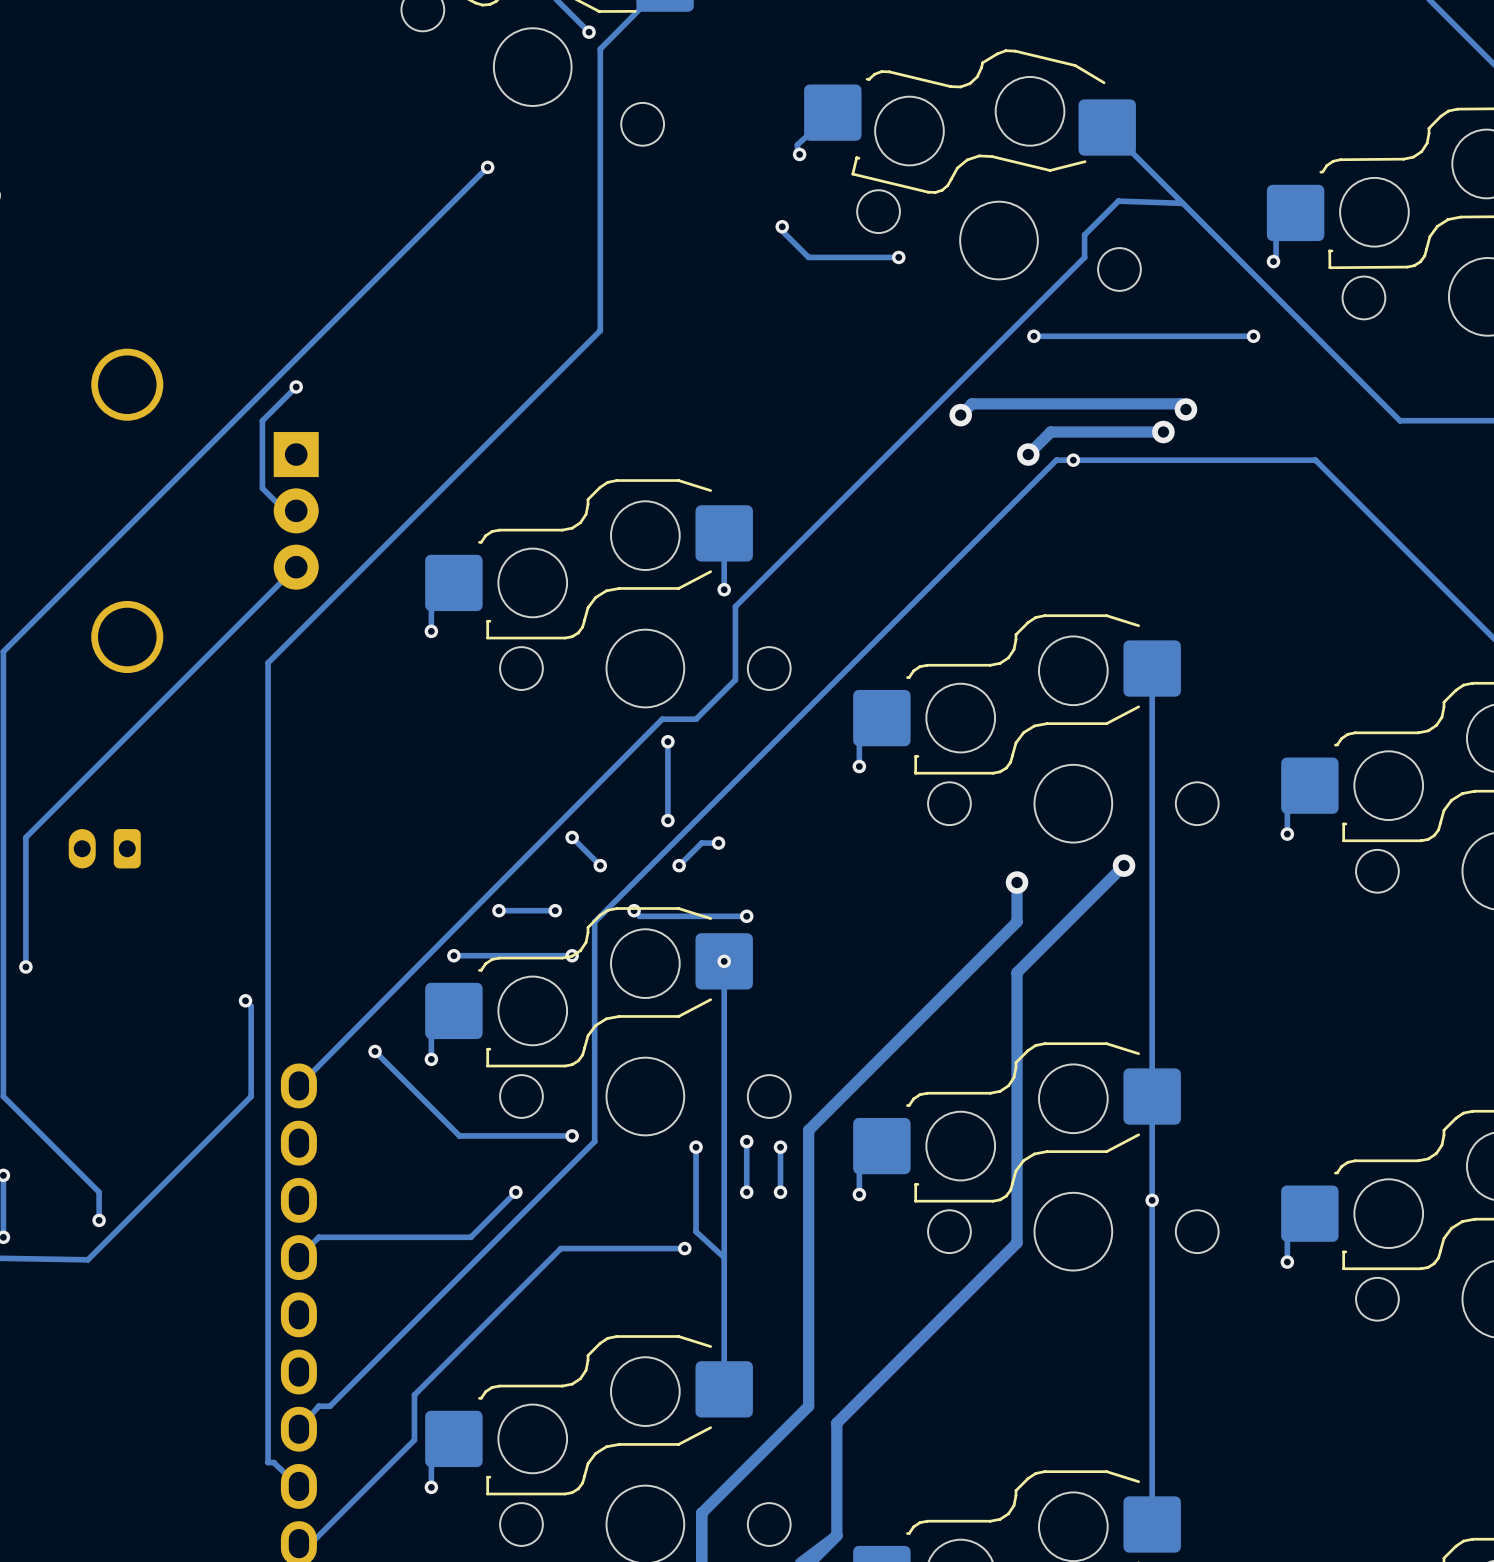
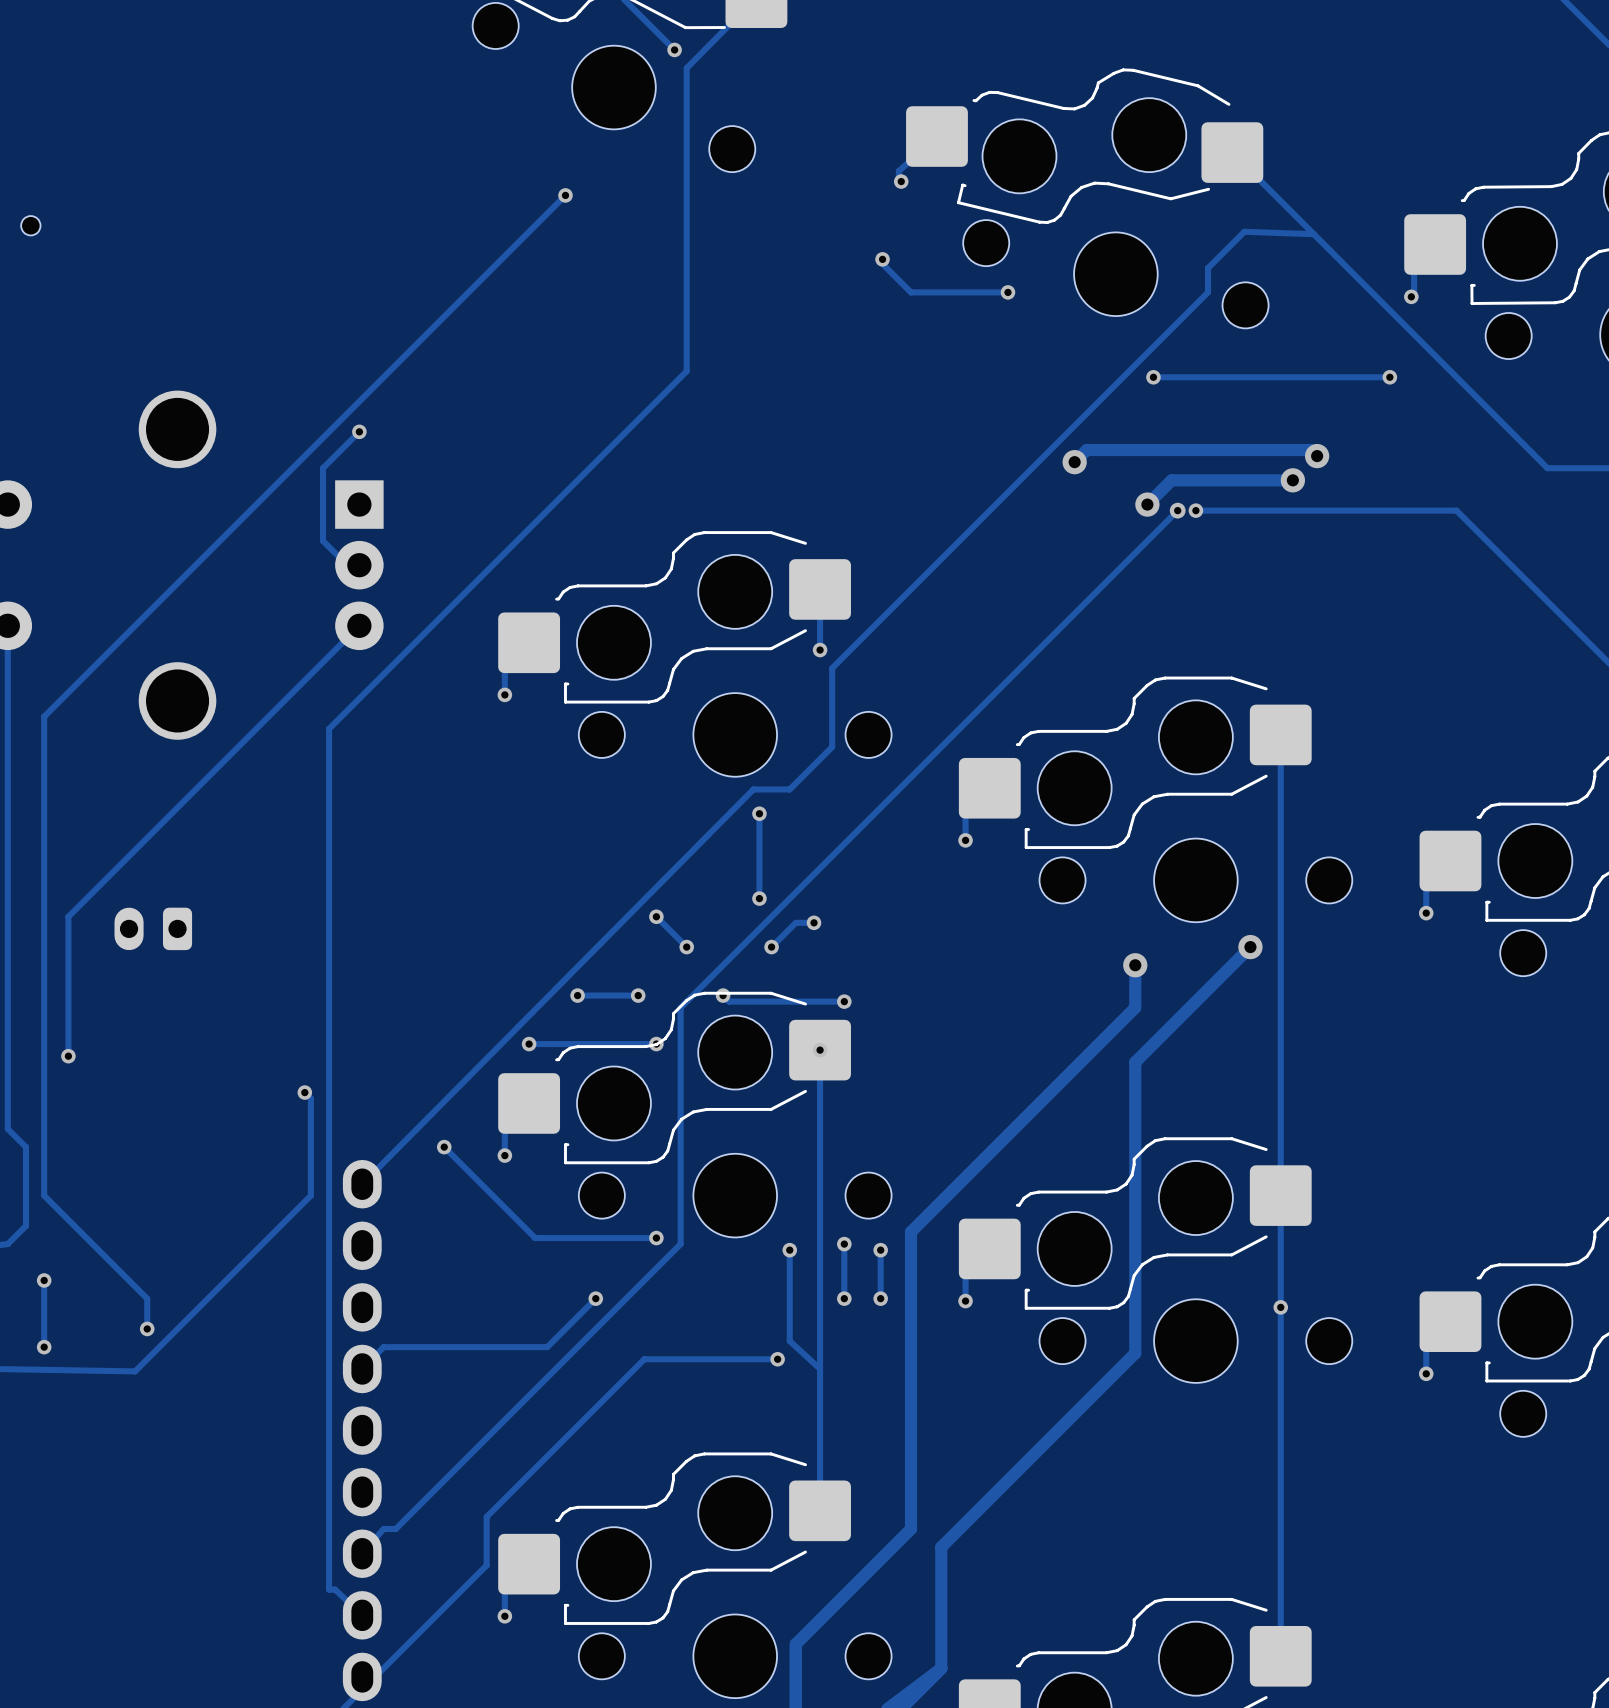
via: none -> (1177, 510)
track: (1073, 460) (1056, 460) -> none

